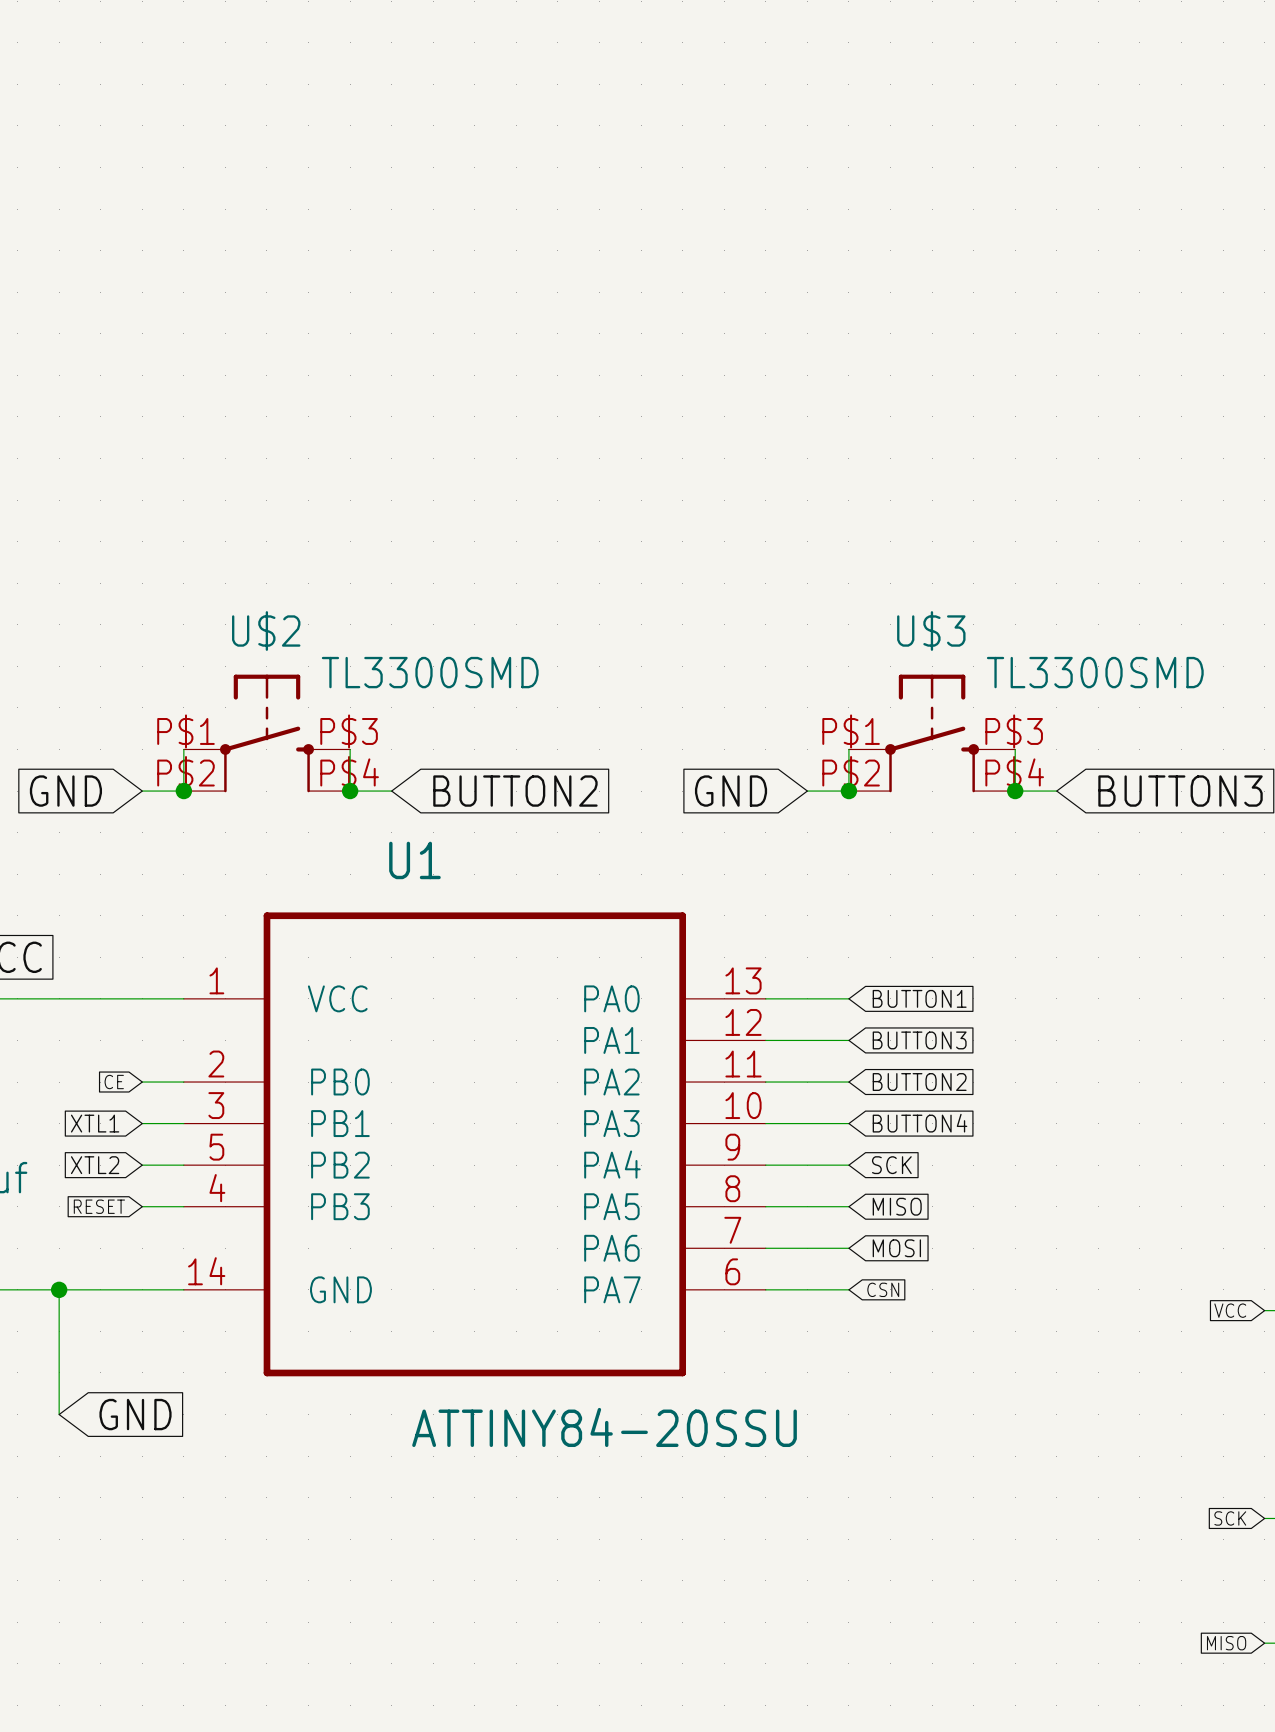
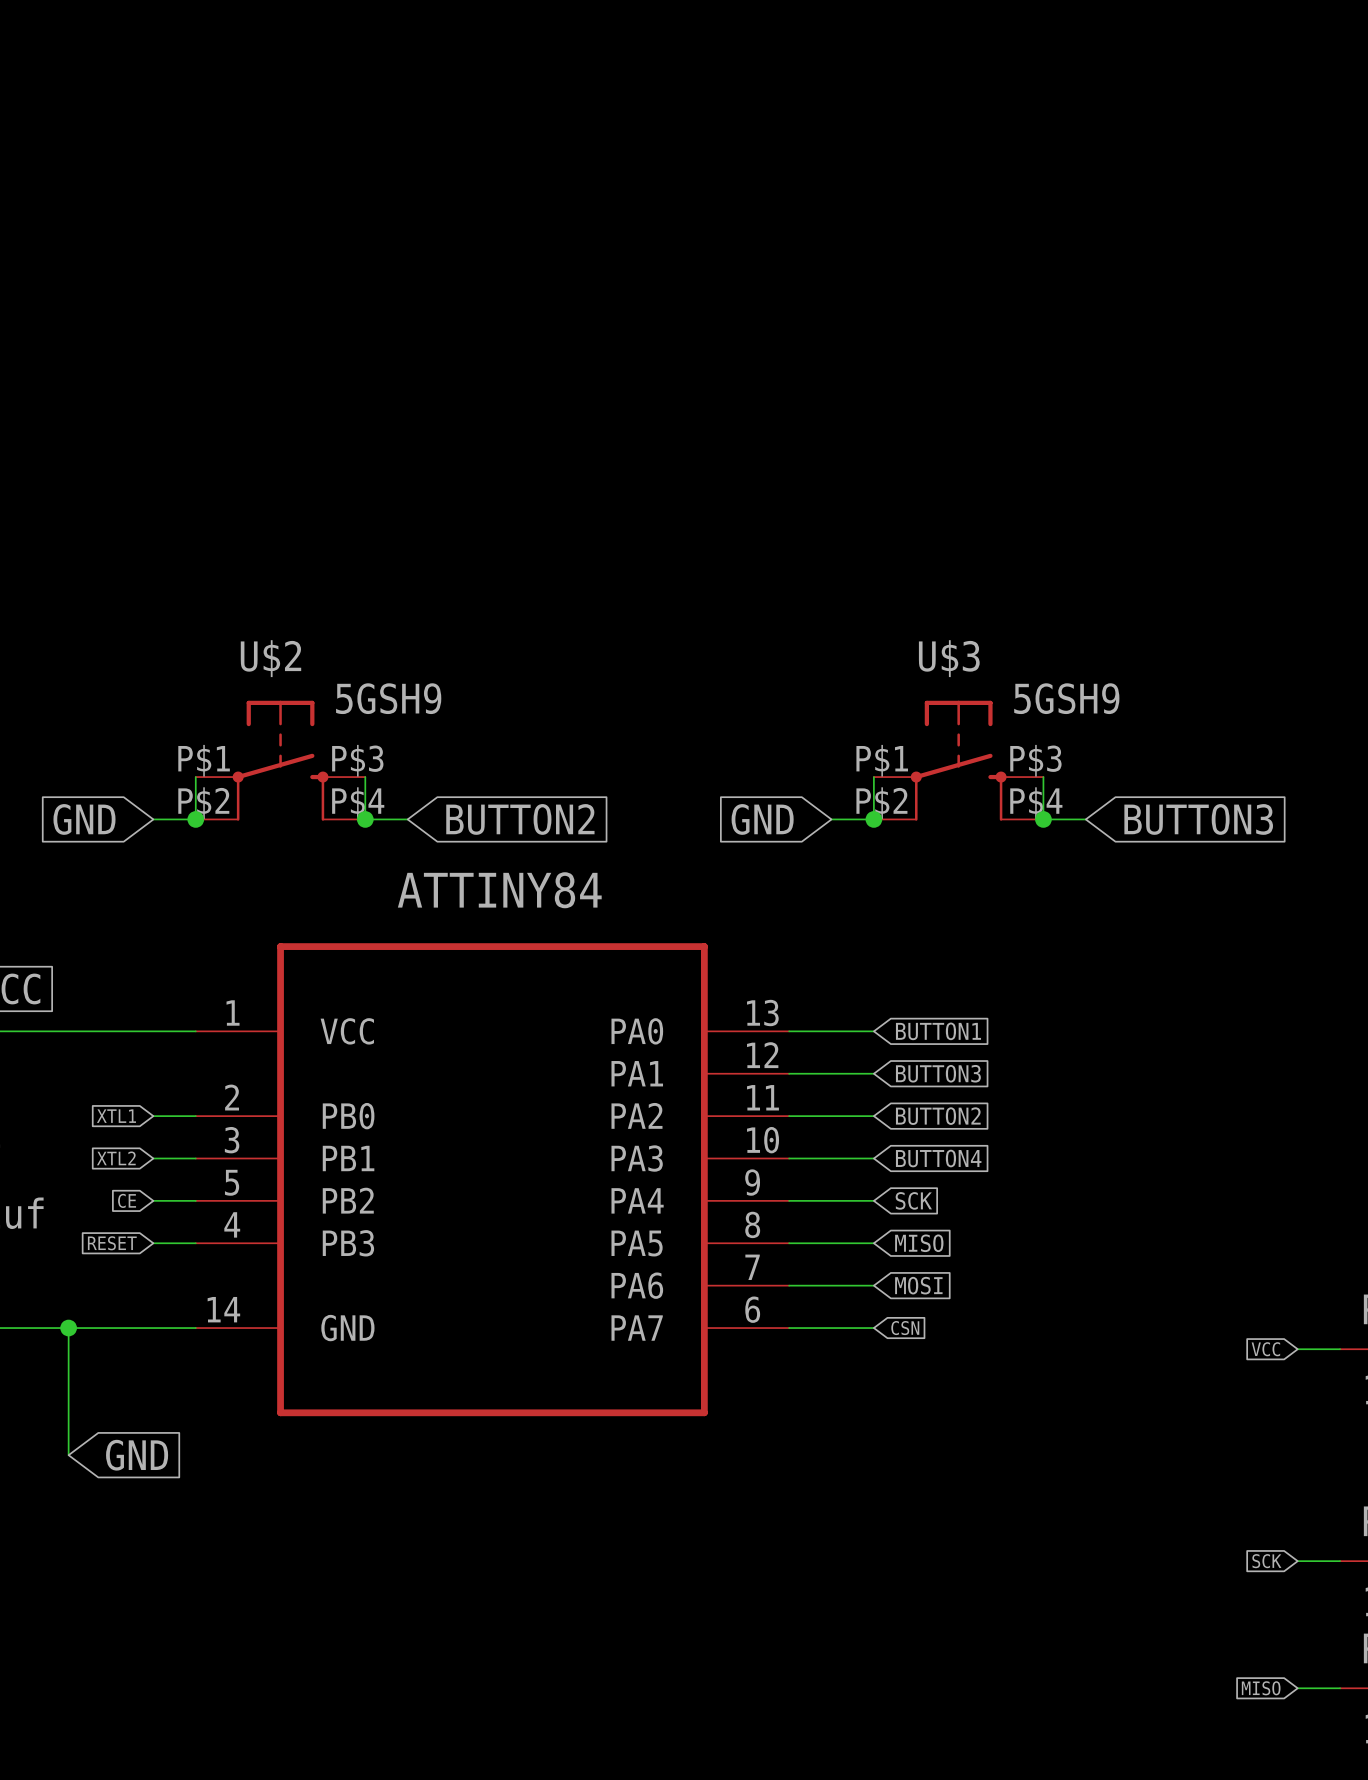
U$2 value: TL3300SMD (430, 672) -> 5GSH9 (388, 698)
U$3 value: TL3300SMD (1095, 672) -> 5GSH9 (1066, 698)
U1 name: U1 (414, 860) -> ATTINY84 (499, 890)
global label: CE (114, 1082) -> XTL1 (116, 1116)
global label: XTL1 (95, 1123) -> XTL2 (116, 1158)
global label: XTL2 (95, 1165) -> CE (127, 1200)
U1 value: ATTINY84-20SSU (604, 1427) -> none

